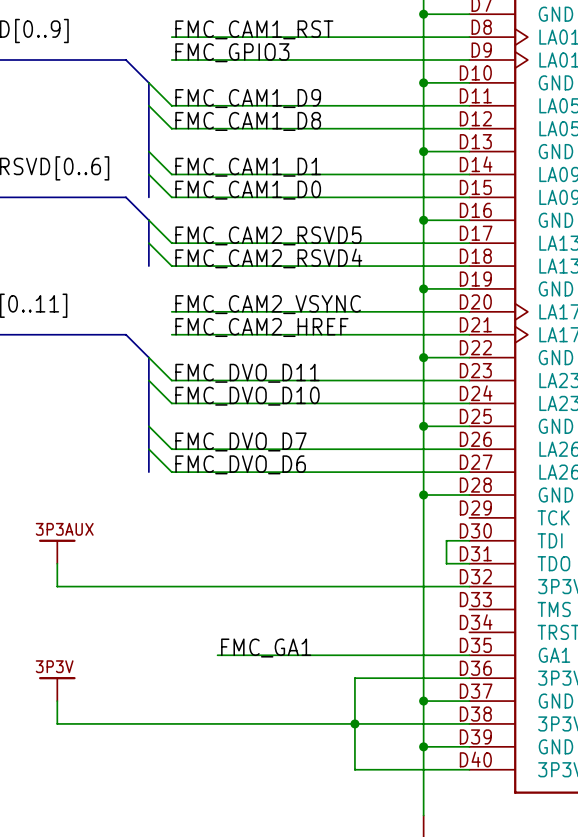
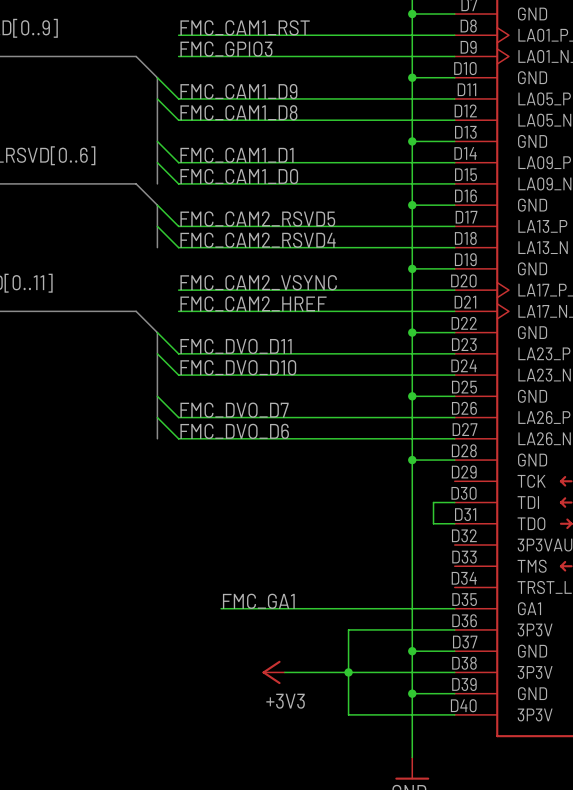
power symbol: 3P3AUX (57, 551) -> none
wire: (57, 563) (57, 586) (469, 586) -> none
power symbol: 3P3V (57, 689) -> none
wire: (57, 701) (57, 723) (286, 723) -> none
power symbol: none -> +3V3 (273, 672)

